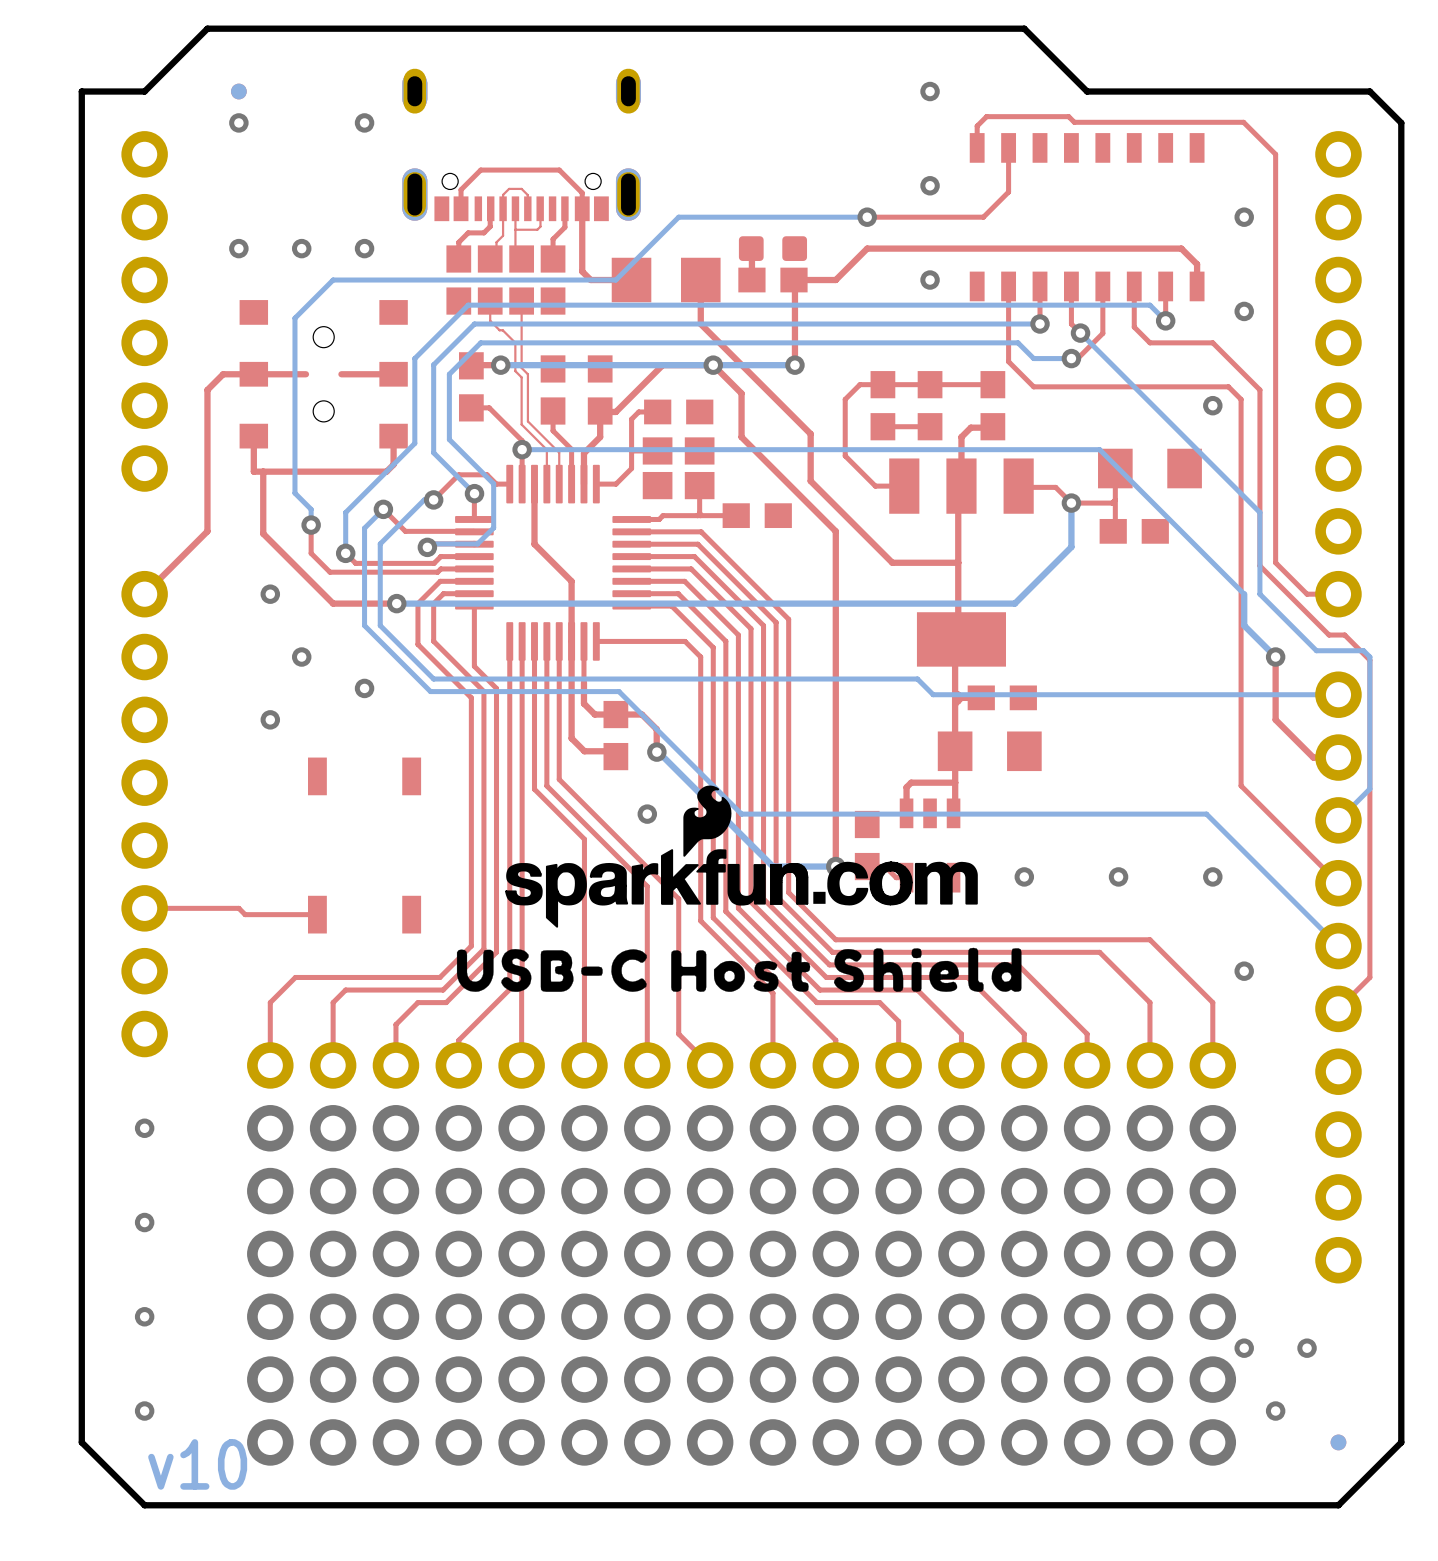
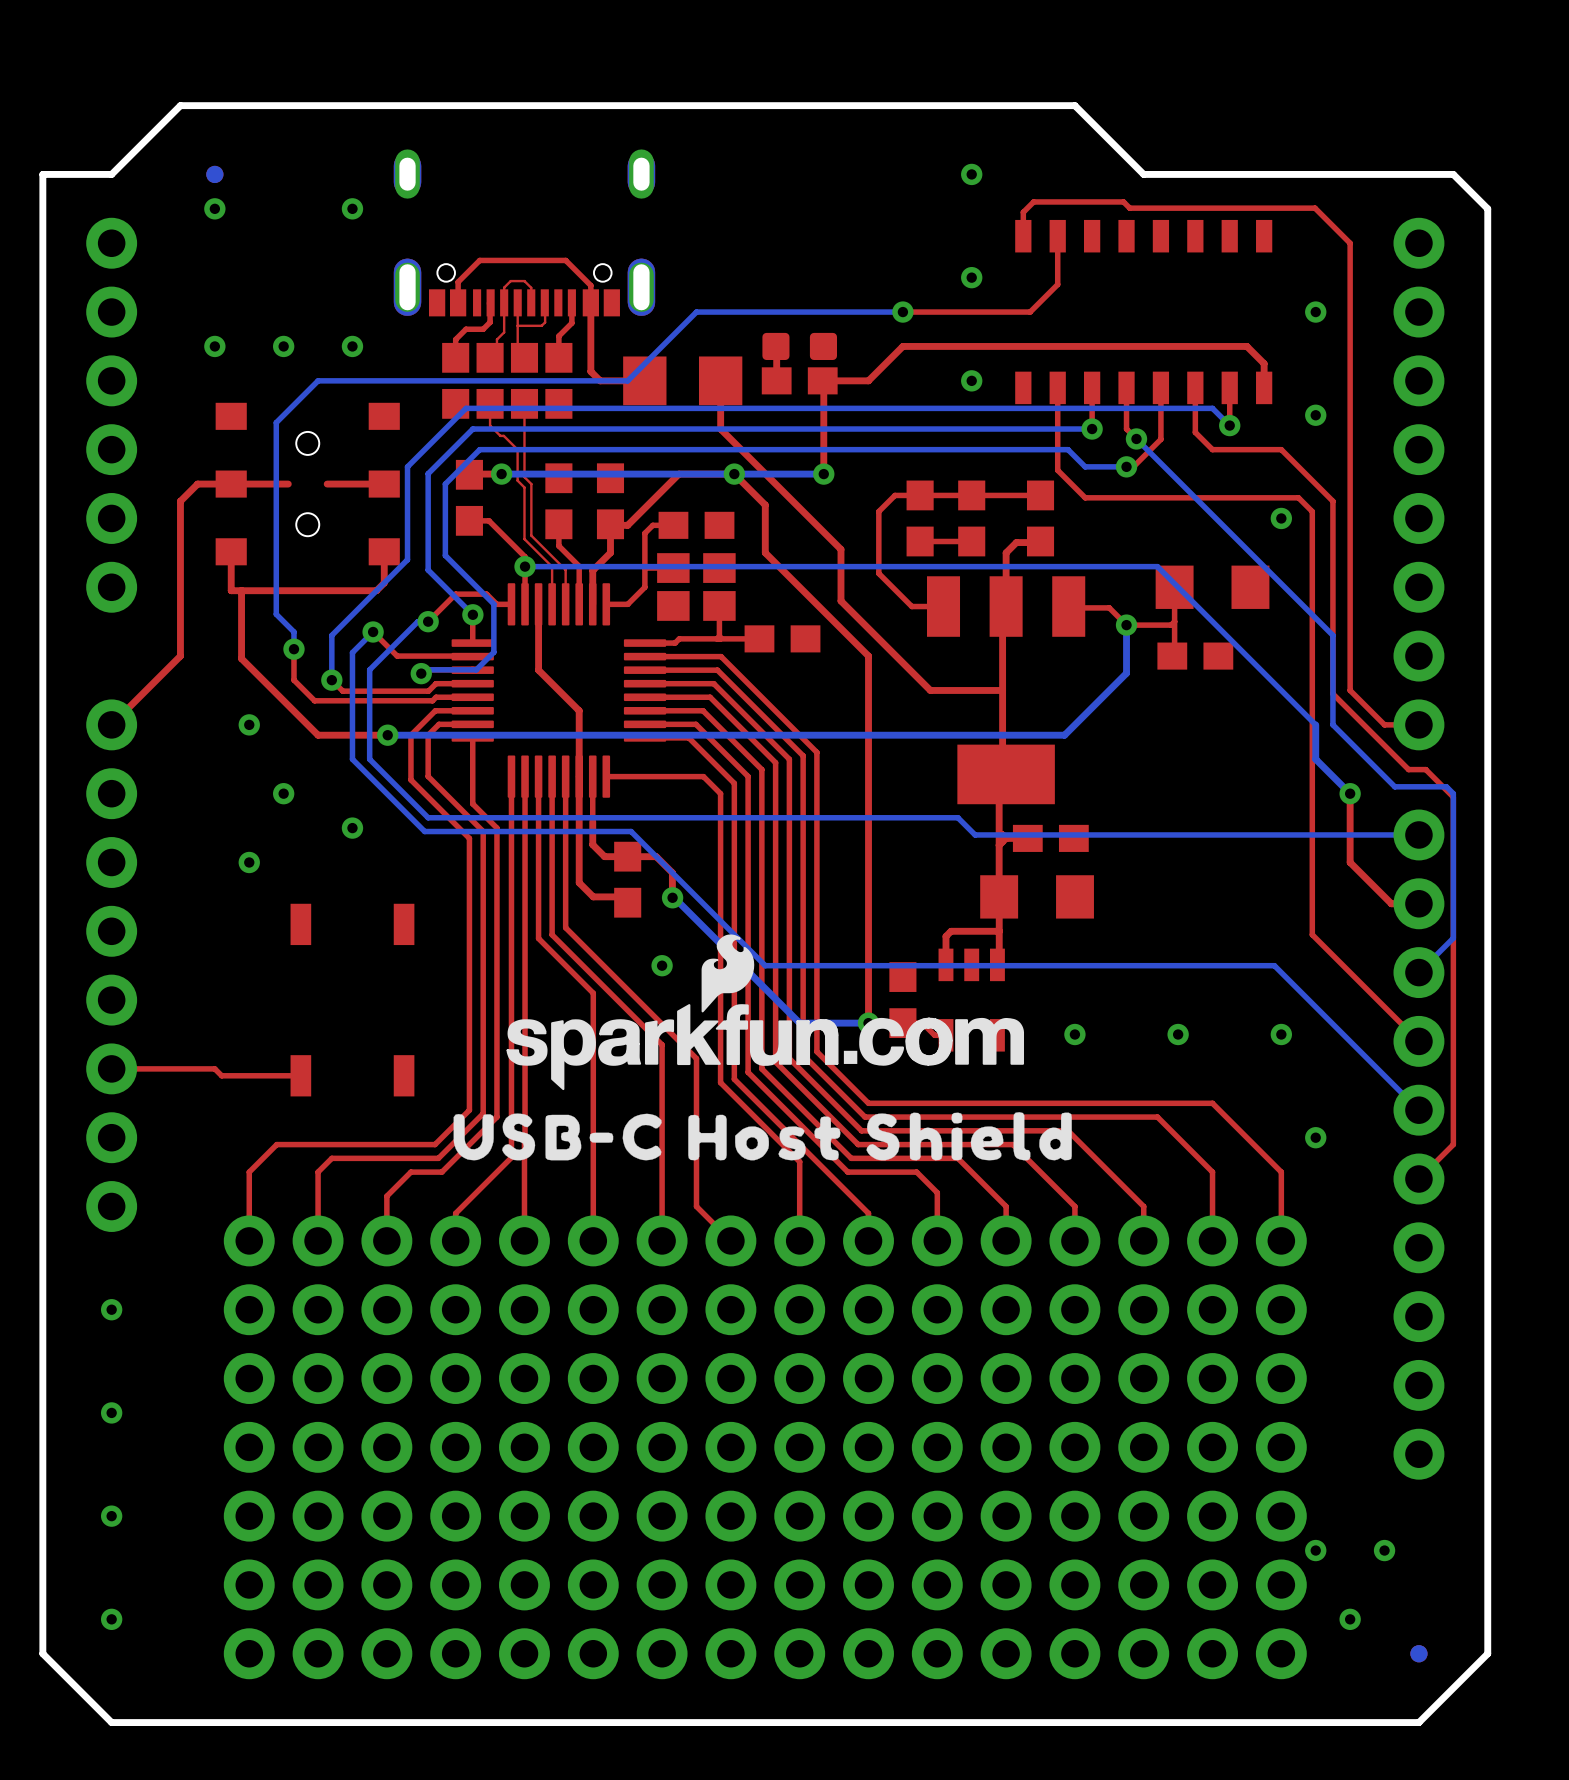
text: v10 (197, 1464) -> none

